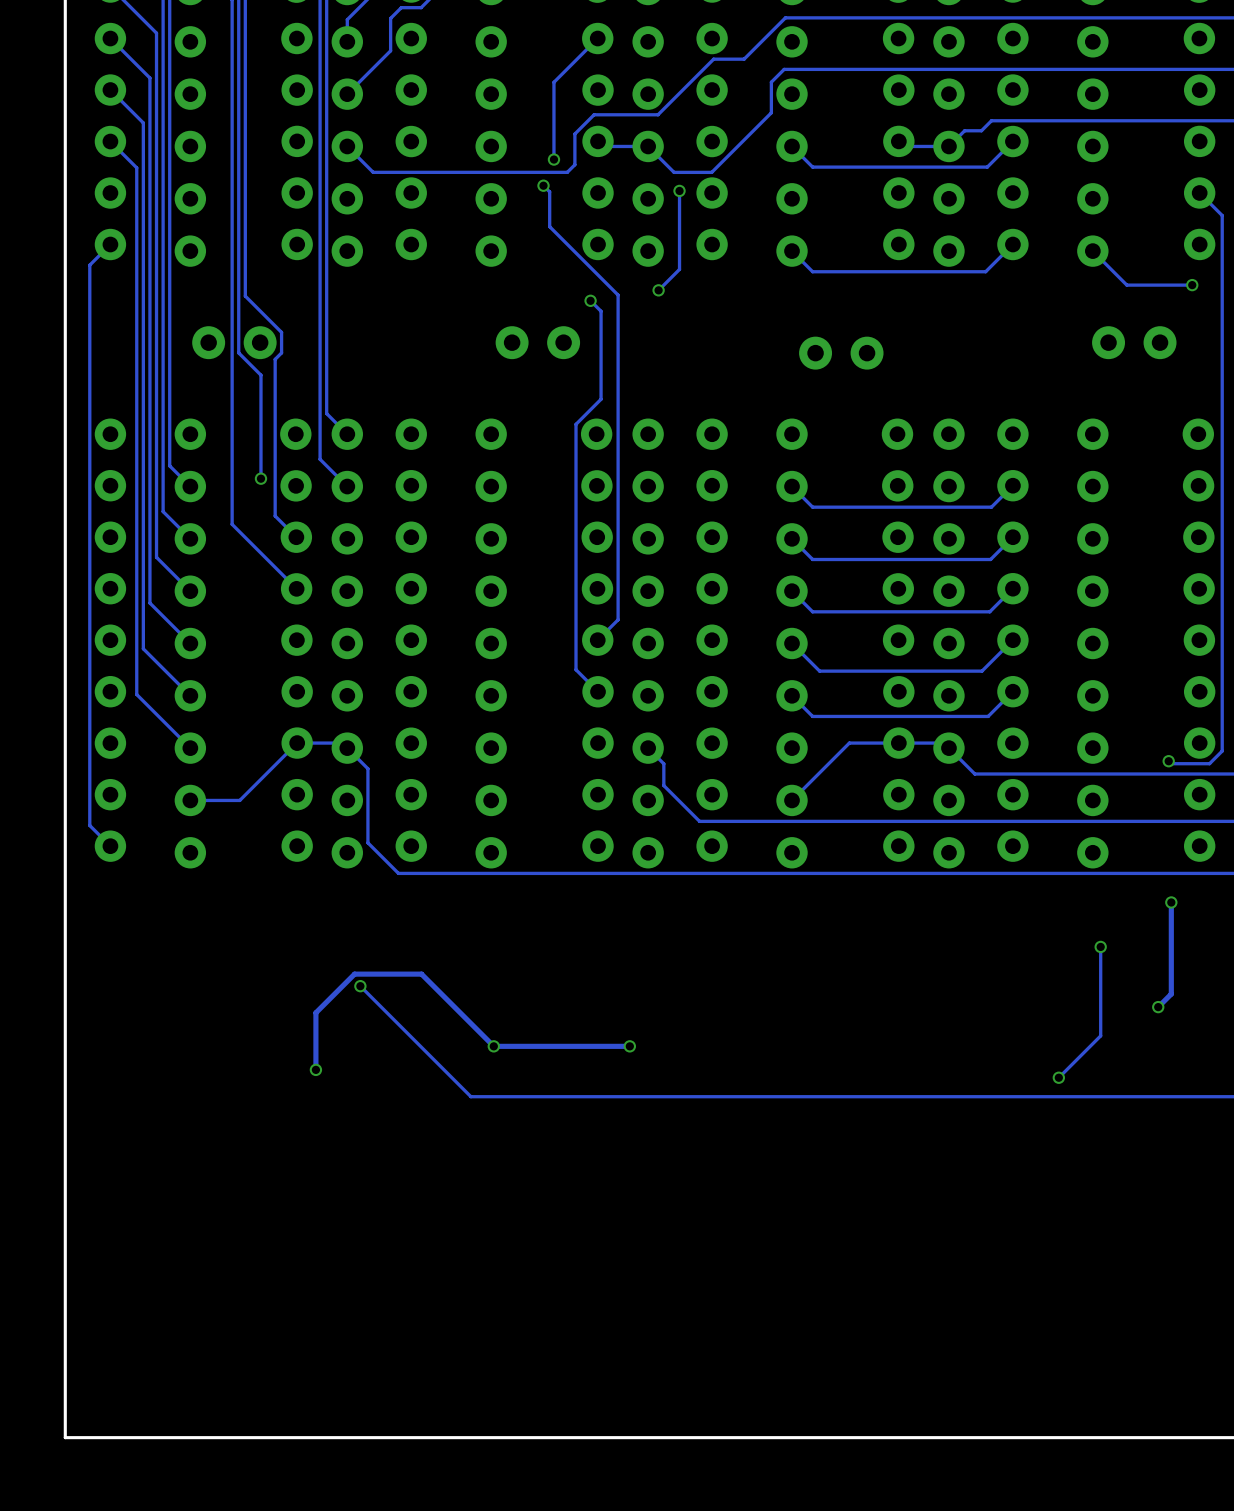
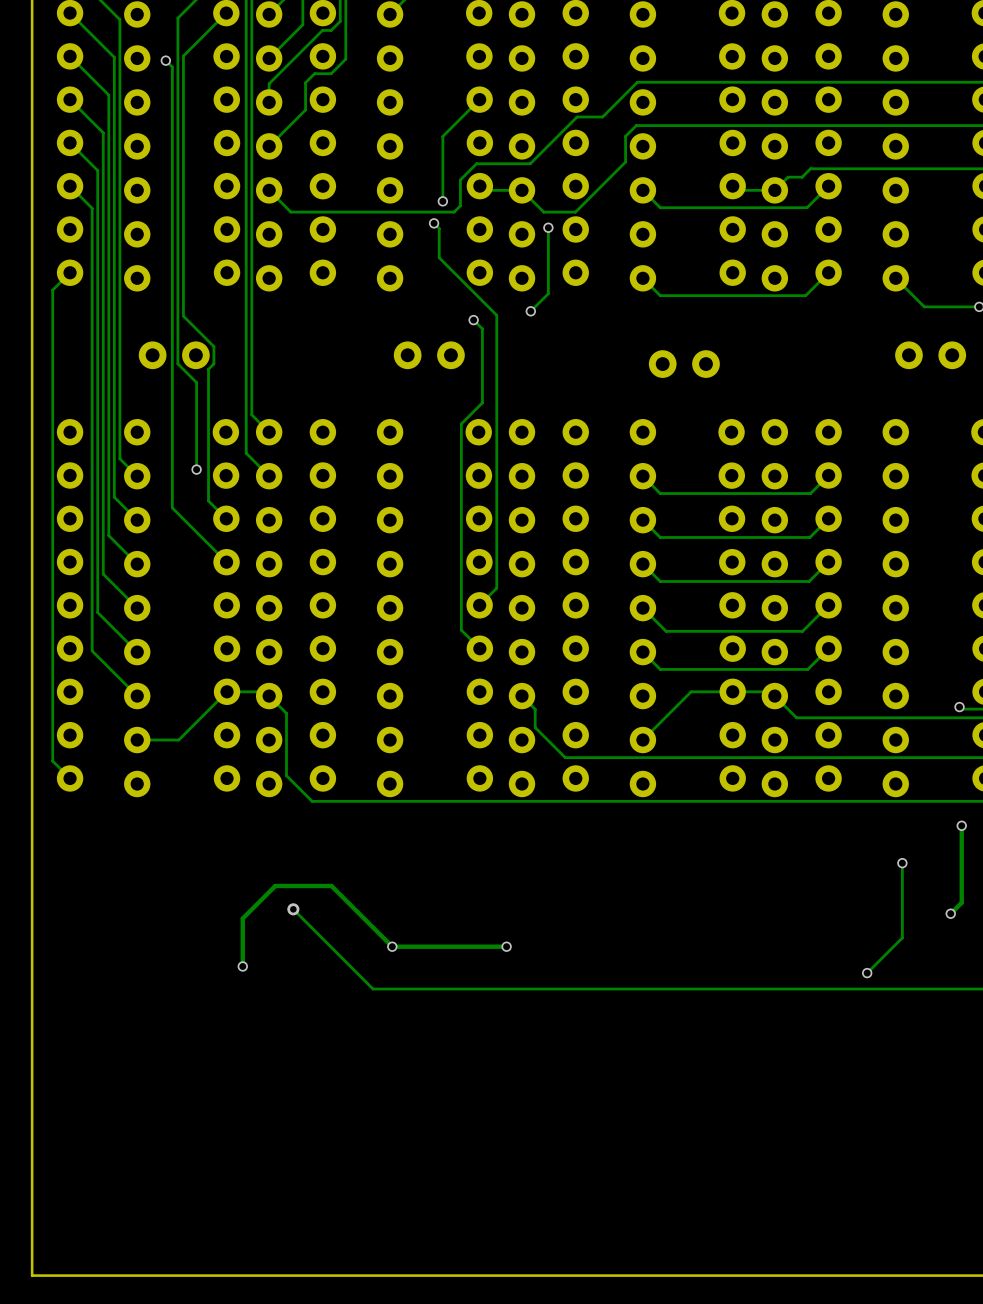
track: (360, 986) (376, 1001) -> none
via: (360, 986) -> none
via: none -> (293, 909)

